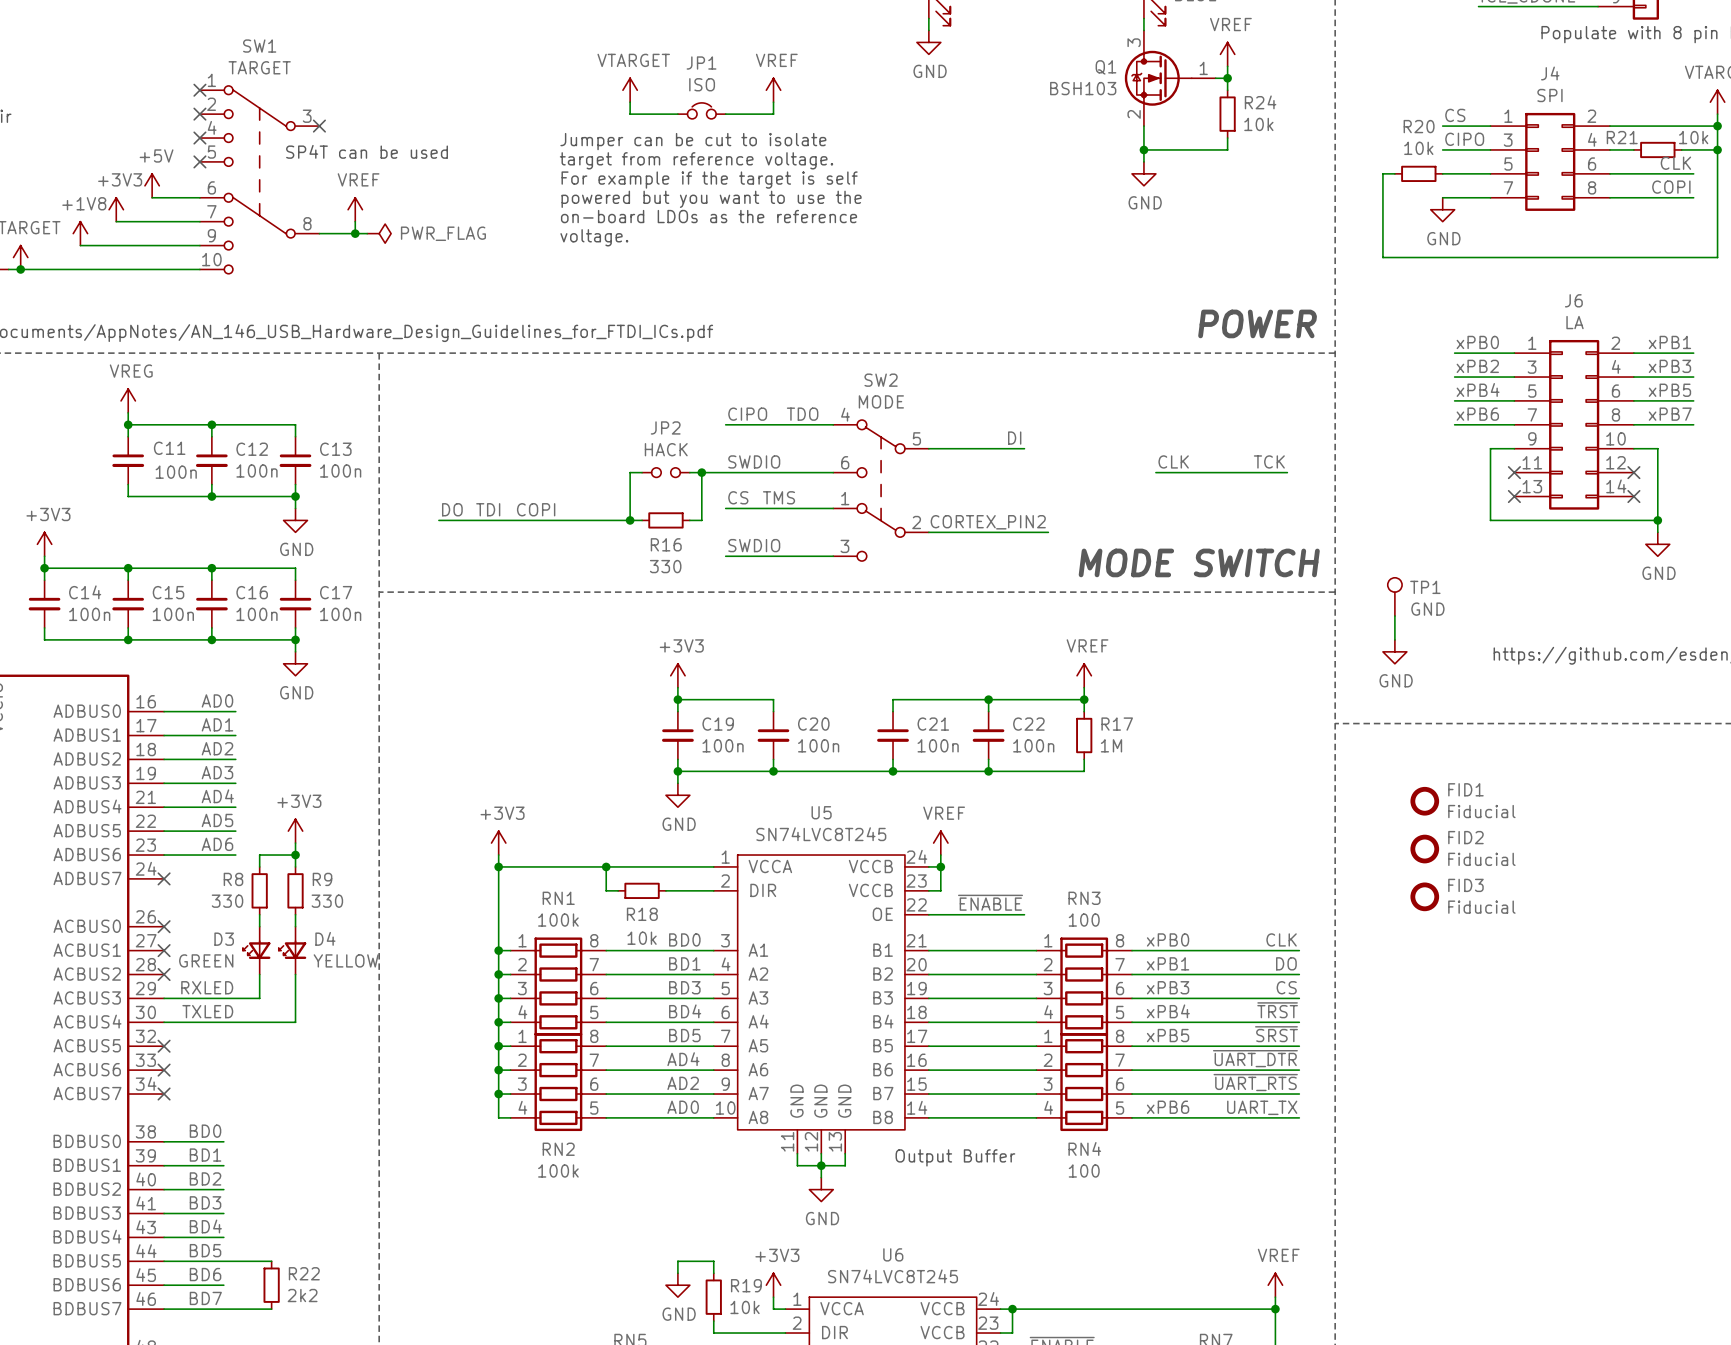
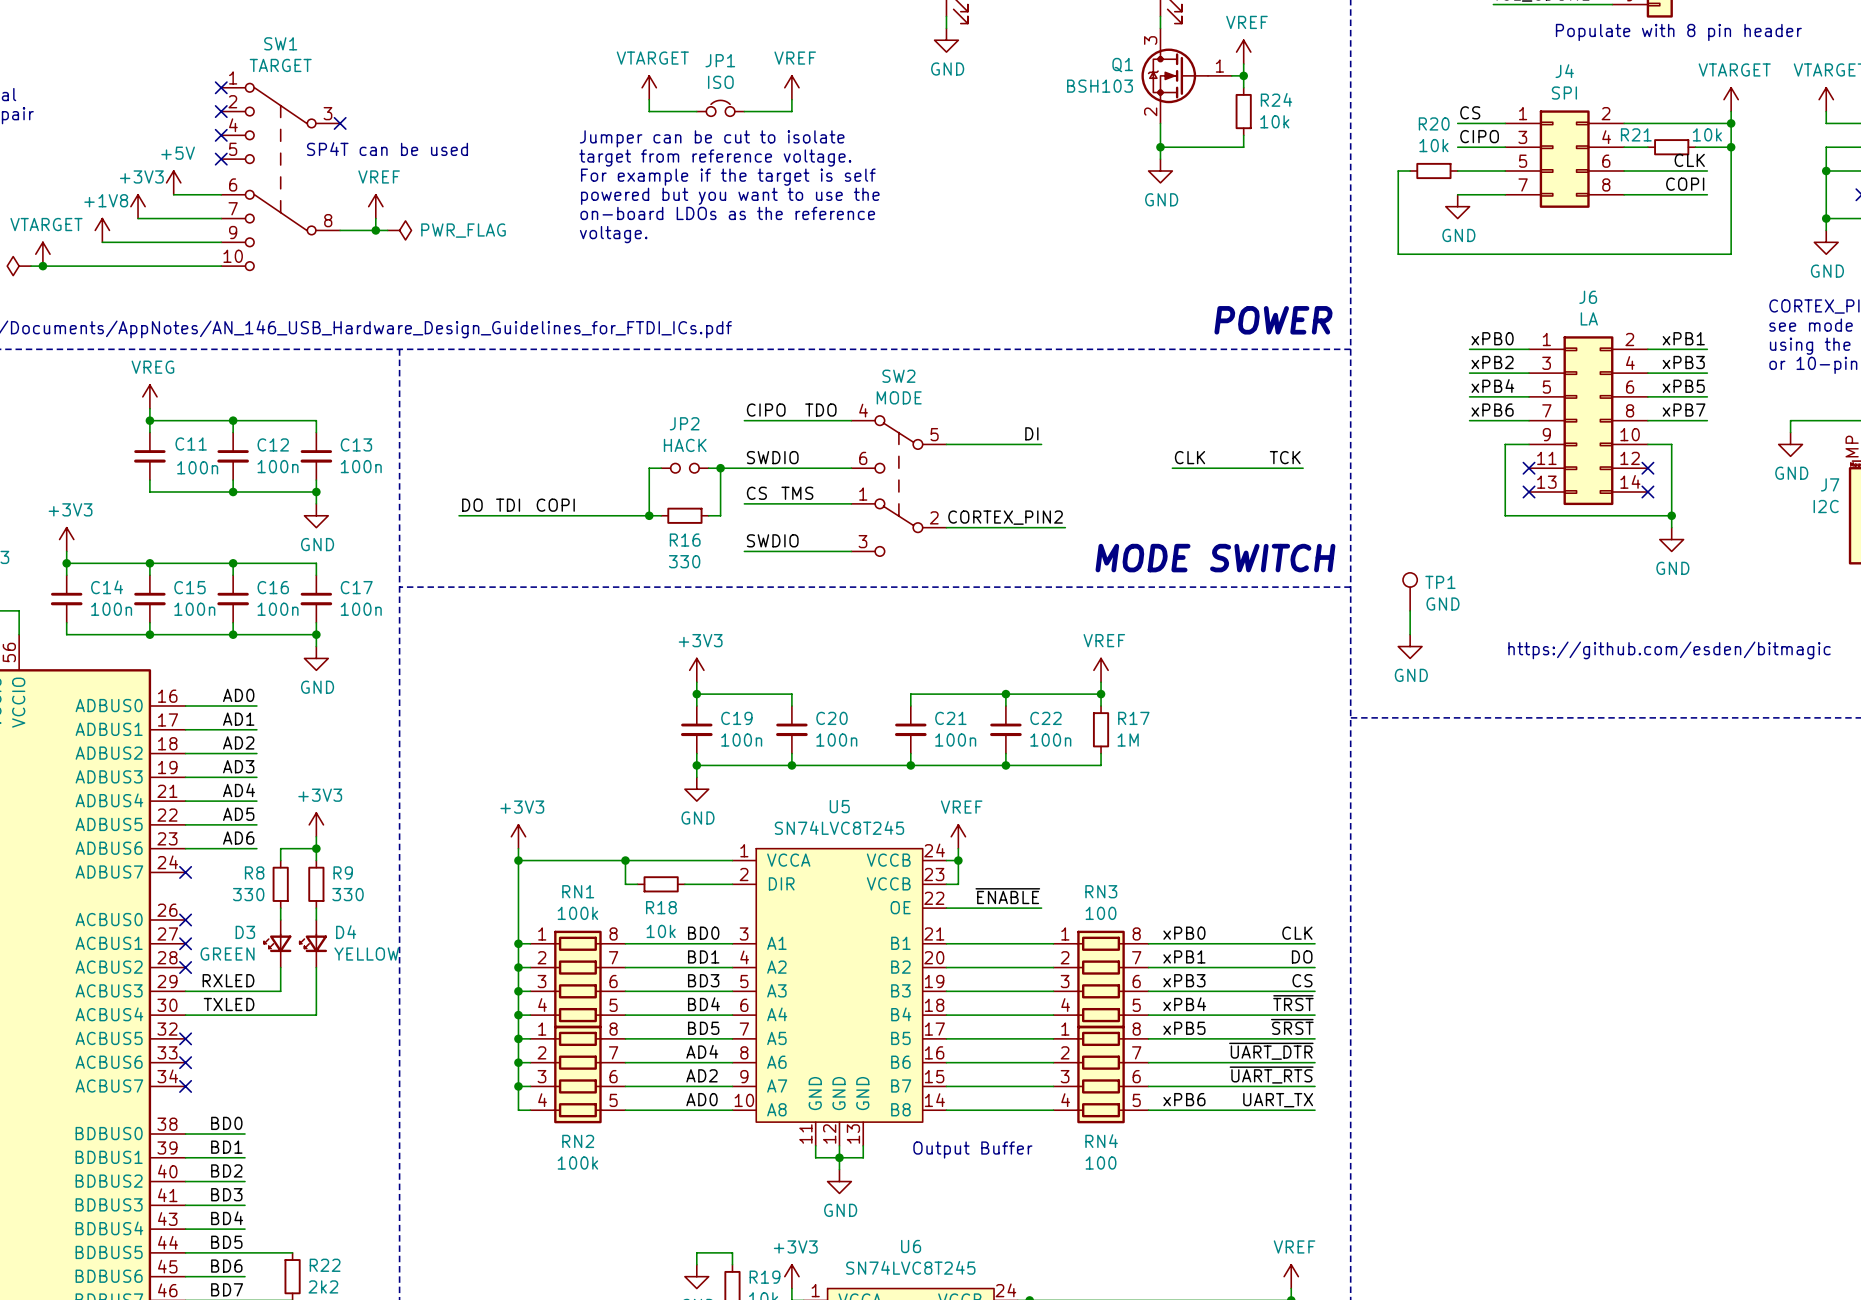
FID1: Fiducial (1424, 801) -> none
FID2: Fiducial (1424, 849) -> none
FID3: Fiducial (1424, 896) -> none

